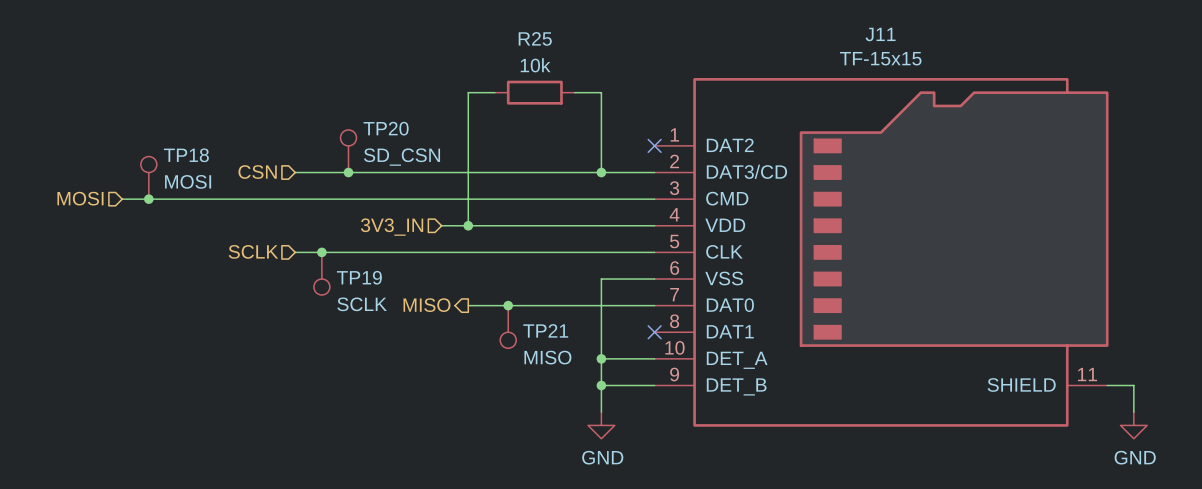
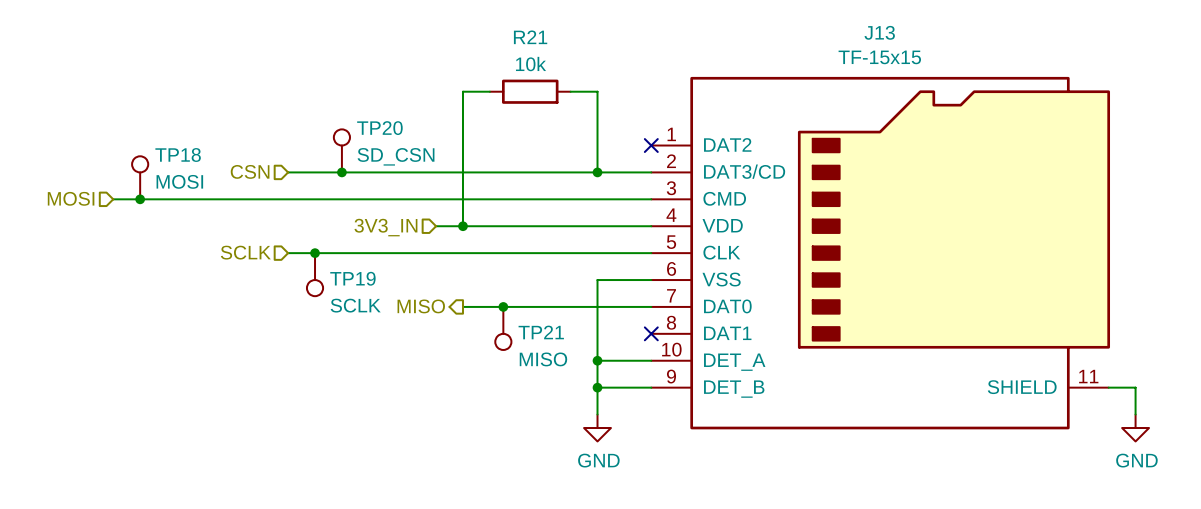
J11 name: J11 (880, 34) -> J13 (879, 32)
R25 name: R25 (535, 38) -> R21 (530, 37)

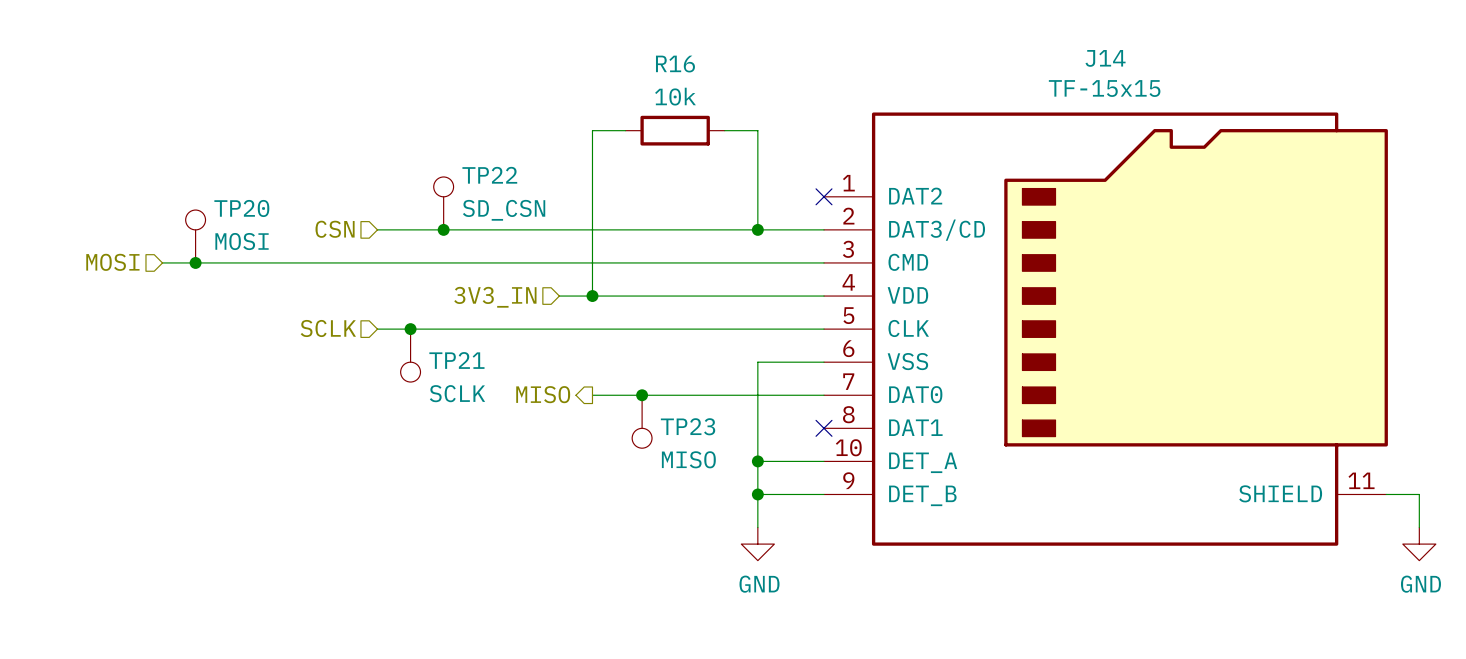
J13 name: J13 (879, 32) -> J14 (1105, 58)
R21 name: R21 (530, 37) -> R16 (675, 64)
TP20 name: TP20 (379, 128) -> TP22 (489, 175)
TP18 name: TP18 (178, 155) -> TP20 (241, 208)
TP19 name: TP19 (352, 278) -> TP21 (456, 360)
TP21 name: TP21 (541, 332) -> TP23 (688, 426)

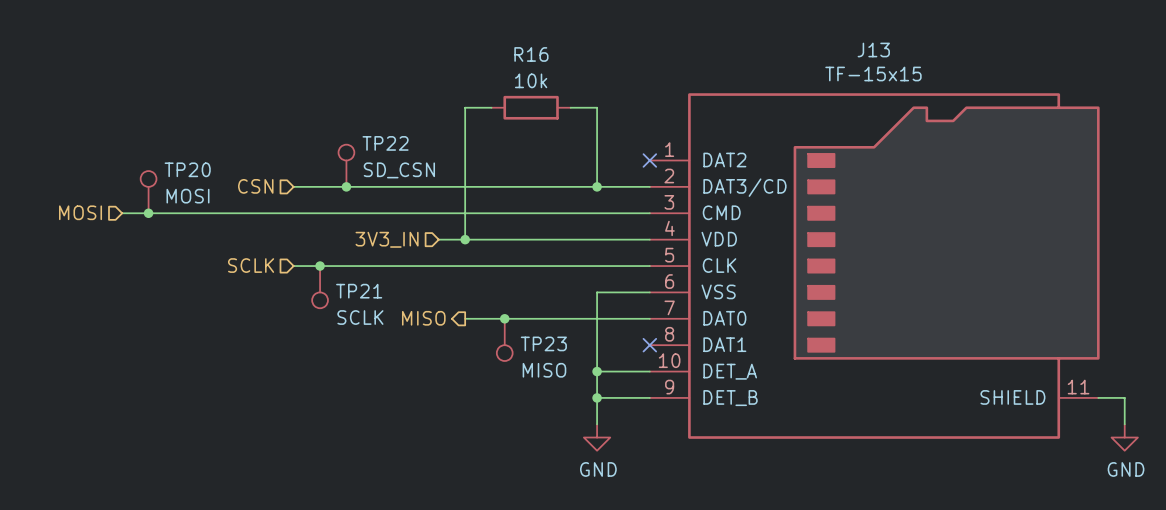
J14 name: J14 (1105, 58) -> J13 (873, 49)

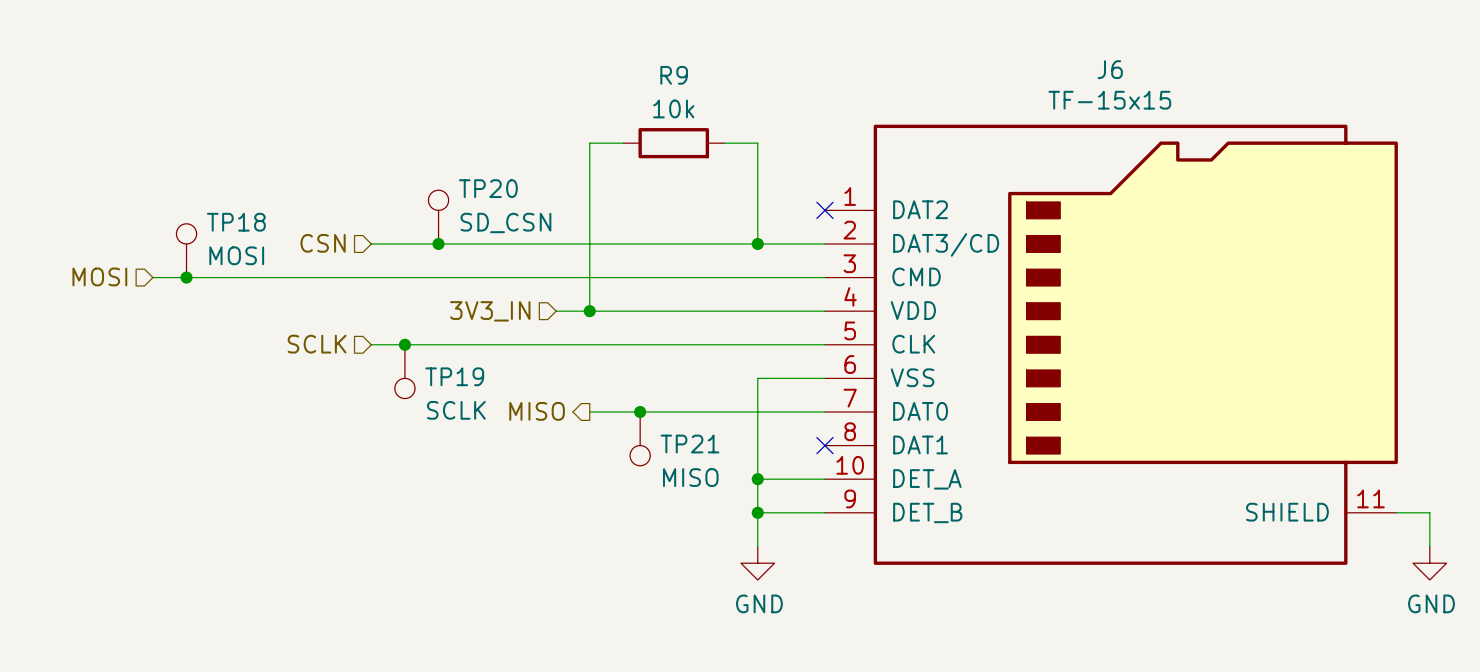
J13 name: J13 (873, 49) -> J6 (1110, 69)
R16 name: R16 (531, 54) -> R9 (674, 75)
TP22 name: TP22 (385, 143) -> TP20 (488, 188)
TP20 name: TP20 (187, 169) -> TP18 (236, 222)
TP21 name: TP21 (359, 291) -> TP19 (454, 376)
TP23 name: TP23 (543, 343) -> TP21 (689, 444)

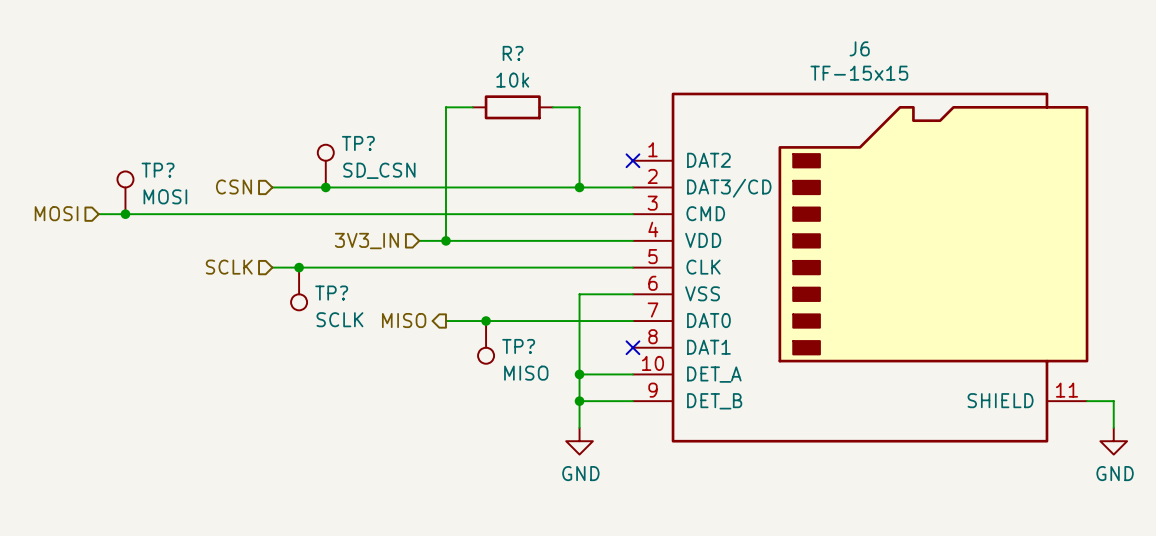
R9 name: R9 (674, 75) -> R? (513, 53)
TP20 name: TP20 (488, 188) -> TP? (358, 143)
TP18 name: TP18 (236, 222) -> TP? (158, 170)
TP19 name: TP19 (454, 376) -> TP? (331, 293)
TP21 name: TP21 (689, 444) -> TP? (518, 346)

